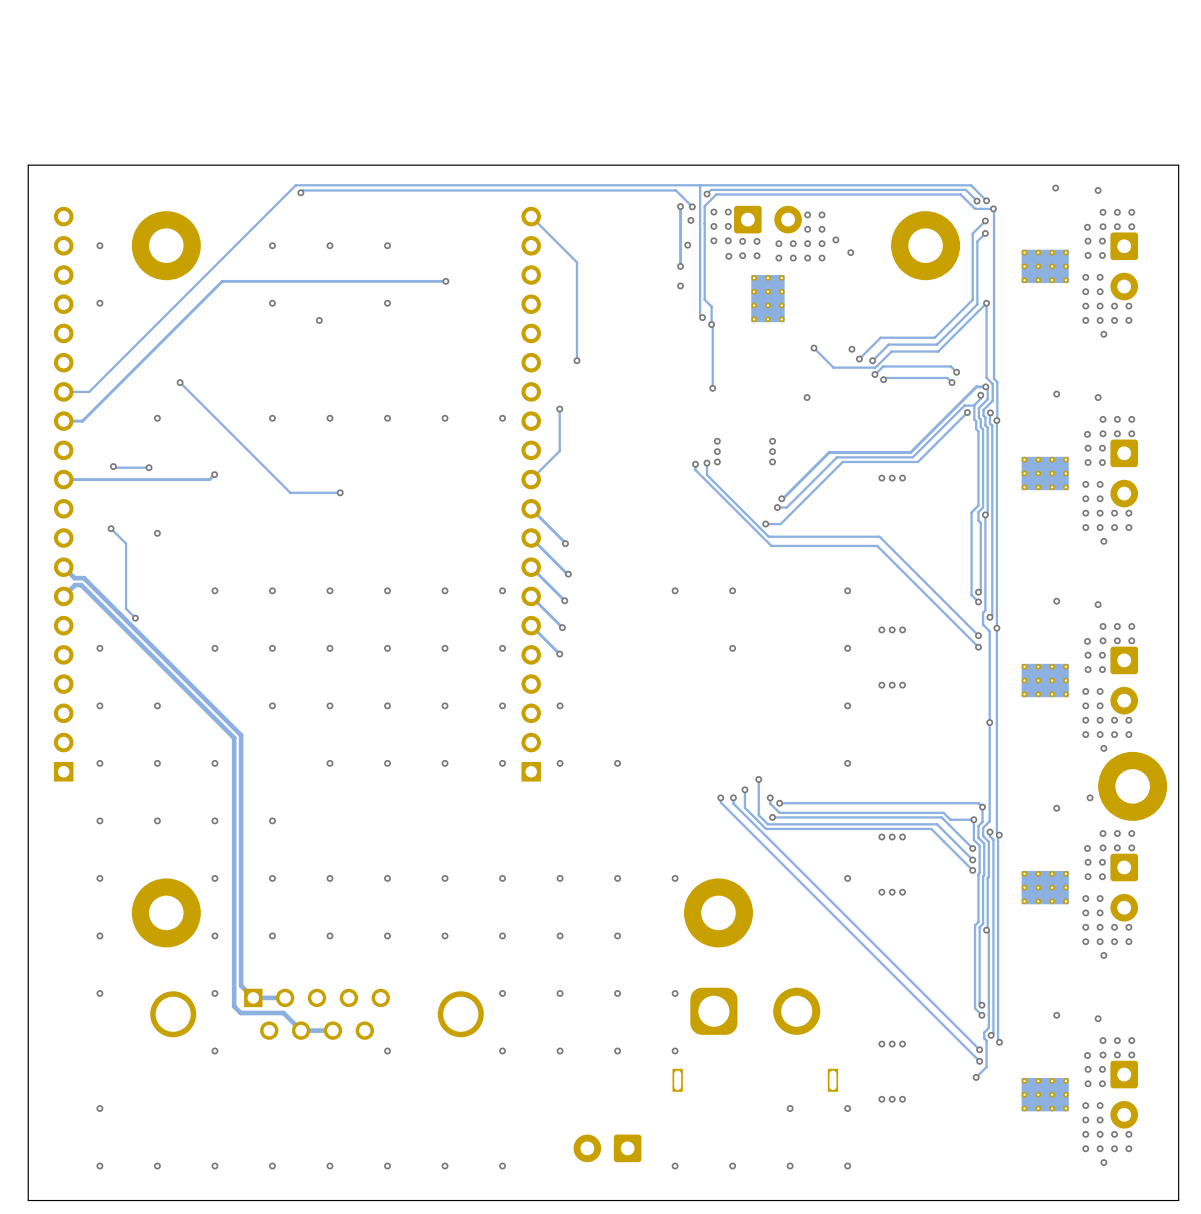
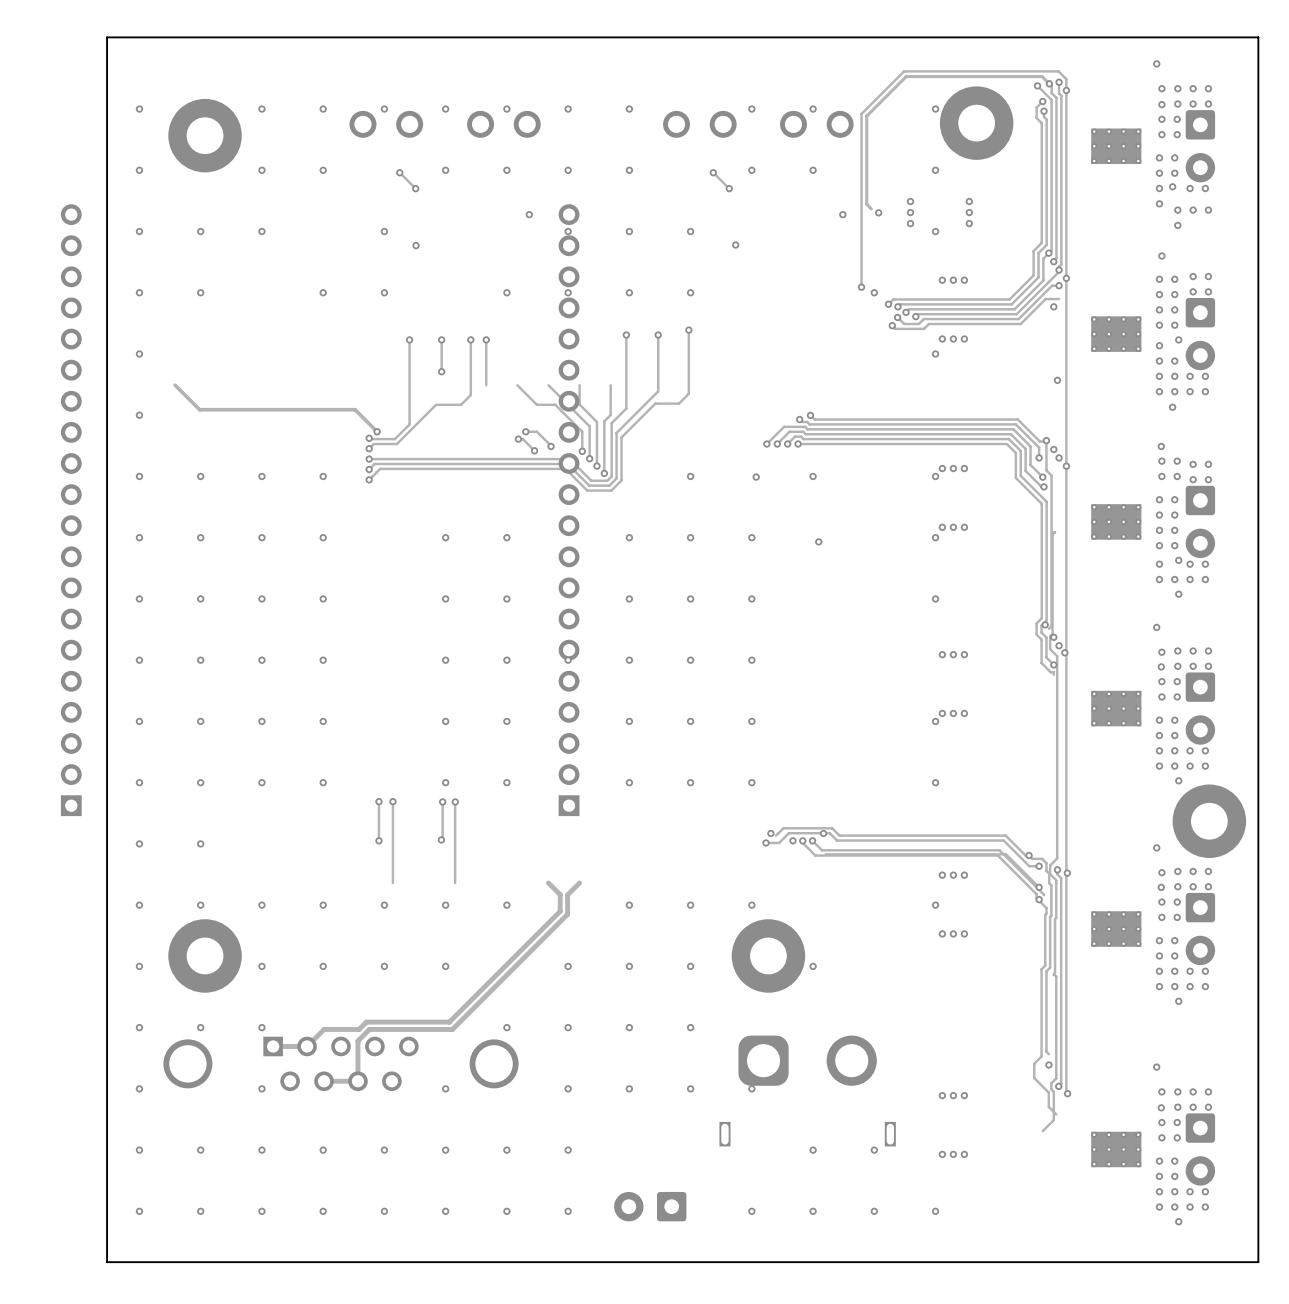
via: none -> (1156, 63)
track: none -> (1059, 82) (1059, 93) (1061, 95) (1061, 264) (1059, 266) (1059, 271) (1016, 314) (918, 314) (915, 316)
via: none -> (1059, 82)
via: none -> (1049, 83)
track: none -> (1037, 85) (1051, 99) (1051, 250) (1049, 253)
via: none -> (1037, 85)
via: none -> (1161, 88)
via: none -> (1177, 88)
via: none -> (1193, 88)
via: none -> (1208, 88)
via: none -> (1066, 90)
track: none -> (1042, 101) (1036, 107) (1036, 118) (1041, 123) (1041, 242) (1033, 251) (1033, 275) (1009, 299) (893, 299) (888, 304)
via: none -> (1042, 101)
via: none -> (1177, 104)
via: none -> (1193, 104)
via: none -> (1208, 104)
via: none -> (1161, 104)
via: none -> (139, 109)
via: none -> (261, 109)
via: none -> (323, 109)
via: none -> (384, 109)
via: none -> (445, 109)
via: none -> (506, 109)
via: none -> (568, 109)
via: none -> (629, 109)
via: none -> (751, 109)
via: none -> (813, 109)
via: none -> (935, 109)
track: none -> (1044, 111) (1044, 117) (1046, 119) (1046, 244) (1038, 253) (1038, 277) (1011, 304) (900, 304) (897, 306)
via: none -> (1044, 111)
via: none -> (1161, 119)
via: none -> (1177, 119)
part: none -> (386, 124)
part: none -> (503, 124)
part: none -> (699, 124)
part: none -> (816, 124)
via: none -> (1161, 134)
via: none -> (1177, 134)
part: none -> (1116, 146)
part: none -> (1200, 146)
via: none -> (1159, 157)
via: none -> (1174, 157)
board edge: (1178, 165) (28, 165) (28, 1200) (97, 1200) -> (1258, 159) (1258, 37) (107, 37) (107, 1262)
via: none -> (139, 170)
via: none -> (261, 170)
via: none -> (445, 170)
via: none -> (506, 170)
via: none -> (568, 170)
via: none -> (629, 170)
via: none -> (751, 170)
via: none -> (813, 170)
via: none -> (935, 170)
track: none -> (399, 172) (415, 188)
via: none -> (399, 172)
track: none -> (713, 172) (729, 188)
via: none -> (713, 172)
via: none -> (1159, 173)
via: none -> (1174, 173)
track: (700, 185) (700, 315) (702, 317) -> none
via: (1055, 188) -> none
track: (300, 192) (303, 190) (675, 190) (692, 206) -> none
via position: (300, 192) -> (323, 170)
via: none -> (415, 188)
via: none -> (729, 188)
via: none -> (1159, 188)
via: none -> (1190, 188)
via: none -> (1205, 188)
track: (706, 194) (711, 189) (965, 189) (977, 201) -> none
via: (706, 194) -> none
track: (986, 200) (970, 185) (295, 185) (89, 391) (63, 391) -> none
via: (986, 200) -> none
via: (977, 201) -> none
via: none -> (910, 201)
via: none -> (969, 201)
track: (680, 206) (680, 266) -> none
via: (680, 206) -> none
via: (692, 206) -> none
via: none -> (1159, 203)
via: (993, 208) -> none
track: none -> (871, 208) (866, 204) (866, 116) (906, 76) (1042, 76) (1051, 86) (1051, 93) (1056, 97) (1056, 257) (1053, 260)
via: (713, 212) -> none
via: (728, 212) -> none
via: (807, 214) -> none
via: none -> (910, 212)
via: none -> (969, 212)
via: none -> (529, 214)
track: (531, 216) (577, 262) (577, 360) -> none
via: none -> (842, 214)
part: (767, 219) -> none
via: (690, 220) -> none
track: (985, 220) (972, 233) (972, 299) (934, 337) (880, 337) (859, 359) -> none
via: (985, 220) -> none
via: none -> (910, 223)
via: none -> (969, 223)
via: (713, 226) -> none
via: (728, 226) -> none
via: (1117, 226) -> none
via: (1131, 226) -> none
via: (1087, 227) -> none
via: (807, 229) -> none
via: (822, 229) -> none
via: none -> (139, 231)
via: none -> (200, 231)
via: none -> (261, 231)
via: none -> (384, 231)
via: none -> (568, 231)
via: none -> (629, 231)
via: none -> (690, 231)
via: none -> (935, 231)
track: (985, 233) (977, 241) (977, 304) (937, 344) (888, 344) (872, 360) -> none
via: (985, 233) -> none
via: (835, 239) -> none
via: (713, 240) -> none
via: (728, 240) -> none
via: (742, 241) -> none
via: (757, 241) -> none
via: (1088, 241) -> none
via: (1102, 241) -> none
via: (778, 243) -> none
via: (793, 243) -> none
via: (807, 243) -> none
via: (822, 243) -> none
via: (99, 245) -> none
part position: (166, 245) -> (205, 135)
via: (272, 245) -> none
via: (329, 245) -> none
part position: (925, 245) -> (976, 123)
via: (850, 252) -> none
track: none -> (1048, 253) (1043, 258) (1043, 280) (1014, 309) (909, 309) (906, 312) (906, 310)
via: none -> (1048, 253)
via: (742, 255) -> none
via: (757, 255) -> none
via: (1102, 255) -> none
via: (728, 256) -> none
via: (778, 258) -> none
via: (793, 258) -> none
via: (807, 258) -> none
via: (822, 258) -> none
via: none -> (1053, 261)
via: (680, 266) -> none
part: (1045, 266) -> none
part: (1124, 266) -> none
via: none -> (1059, 270)
via: none -> (1193, 276)
via: none -> (1208, 276)
via: none -> (1066, 278)
via: none -> (942, 280)
via: none -> (953, 280)
via: none -> (964, 280)
track: (445, 281) (222, 281) (82, 421) (63, 421) -> none
via: (445, 281) -> none
track: none -> (1059, 285) (1052, 285) (1018, 319) (923, 319) (918, 323) (904, 323) (897, 317)
via: none -> (1059, 285)
track: none -> (861, 287) (861, 113) (904, 71) (1058, 71) (1066, 79) (1066, 1093)
via: none -> (861, 287)
via: (680, 285) -> none
via: none -> (139, 292)
via: none -> (200, 292)
via: none -> (323, 292)
via: none -> (384, 292)
via: none -> (506, 292)
via: none -> (568, 292)
via: none -> (629, 292)
via: none -> (690, 292)
via: none -> (874, 292)
via: none -> (1193, 291)
via: none -> (1208, 291)
track: none -> (1059, 299) (1045, 299) (1020, 323) (928, 323) (923, 328) (895, 328) (892, 325)
part: (767, 298) -> none
via: none -> (888, 304)
via: (99, 303) -> none
via: (272, 303) -> none
via: (387, 303) -> none
via: none -> (897, 306)
via: (1114, 306) -> none
via: (1128, 306) -> none
via: none -> (906, 312)
via: none -> (915, 316)
via: none -> (897, 317)
via: (702, 317) -> none
via: (319, 320) -> none
via: none -> (892, 325)
via: (1114, 320) -> none
via: (1128, 320) -> none
via: (711, 324) -> none
track: none -> (688, 330) (688, 393) (679, 403) (655, 403) (621, 437) (621, 480) (611, 490) (587, 490) (565, 468) (380, 468) (369, 479)
via: none -> (688, 330)
part: none -> (1116, 334)
part: none -> (1200, 334)
track: none -> (626, 335) (626, 408) (611, 423) (611, 476) (607, 480) (591, 480) (569, 459) (369, 459)
via: none -> (626, 335)
track: none -> (658, 335) (658, 391) (616, 432) (616, 478) (609, 485) (589, 485) (567, 463) (374, 463) (369, 469)
via: none -> (658, 335)
via: none -> (942, 339)
via: none -> (953, 339)
via: none -> (964, 339)
track: none -> (409, 339) (409, 424) (394, 439) (369, 438)
via: none -> (409, 339)
track: none -> (441, 339) (441, 371)
via: none -> (441, 339)
track: none -> (470, 339) (470, 395) (461, 404) (436, 404) (396, 444) (373, 444) (369, 448)
via: none -> (470, 339)
track: none -> (486, 339) (486, 385)
via: none -> (486, 339)
via: none -> (1159, 345)
via: none -> (139, 354)
via: none -> (935, 354)
track: (813, 348) (833, 367) (875, 367) (891, 351) (938, 351) (986, 303) (986, 377) (992, 384) (992, 400) (983, 410) (985, 425) (987, 427) (987, 514) -> none
via: (813, 348) -> none
via: (851, 349) -> none
via: none -> (1159, 361)
via: none -> (1174, 361)
via: (859, 359) -> none
via: (577, 360) -> none
via: (872, 360) -> none
via: none -> (441, 371)
via: none -> (1159, 376)
via: none -> (1174, 376)
via: none -> (1190, 376)
via: none -> (1205, 376)
track: (956, 372) (950, 366) (883, 366) (875, 374) -> none
via: (956, 372) -> none
via: none -> (1057, 380)
via: (874, 374) -> none
track: none -> (175, 385) (199, 409) (355, 409) (377, 431)
track: none -> (517, 385) (536, 404) (555, 404) (582, 431) (582, 451)
track: none -> (548, 385) (589, 426) (589, 457)
track: none -> (579, 385) (579, 404) (596, 421) (596, 466)
track: none -> (610, 385) (610, 414) (604, 421) (604, 473)
track: (883, 379) (885, 377) (947, 377) (952, 382) -> none
via: (883, 379) -> none
track: (180, 382) (290, 492) (340, 492) -> none
via: (180, 382) -> none
via: (952, 382) -> none
via: none -> (1159, 391)
via: none -> (1174, 391)
via: none -> (1190, 391)
via: none -> (1205, 391)
via: (985, 386) -> none
track: (712, 388) (711, 306) (704, 299) (704, 206) (716, 194) (960, 194) (975, 208) (994, 209) (994, 378) (997, 382) (996, 832) (999, 835) (999, 1042) -> none
via: (712, 388) -> none
via: (1056, 394) -> none
track: (980, 395) (980, 398) (973, 405) -> none
via: (980, 395) -> none
via: (807, 397) -> none
via: none -> (139, 415)
track: none -> (810, 415) (814, 419) (1017, 419) (1039, 441) (1046, 440) (1046, 470) (1051, 475) (1051, 626) (1049, 628)
via: none -> (810, 415)
track: (973, 405) (974, 419) (978, 431) (978, 505) (971, 512) (971, 595) (978, 601) -> none
track: (973, 405) (964, 405) (912, 457) (836, 457) (786, 507) (777, 507) -> none
track: (559, 409) (559, 451) (531, 479) -> none
via: (559, 409) -> none
track: none -> (799, 419) (809, 424) (1015, 424) (1039, 447) (1039, 457)
via: none -> (799, 419)
track: (967, 412) (917, 461) (842, 461) (780, 524) (765, 524) -> none
via: (967, 412) -> none
track: (990, 412) (989, 423) (992, 425) (992, 614) (989, 617) -> none
via: (990, 412) -> none
via: (157, 418) -> none
via: (272, 418) -> none
via: (329, 418) -> none
via: (387, 418) -> none
via: (445, 418) -> none
via: (502, 418) -> none
via: (1103, 419) -> none
via: (1117, 419) -> none
via: (1131, 419) -> none
via: none -> (377, 431)
track: none -> (525, 431) (536, 431) (551, 446)
via: none -> (525, 431)
via: (996, 420) -> none
via: none -> (369, 438)
track: none -> (518, 439) (522, 439) (534, 450)
via: none -> (518, 439)
via: none -> (1046, 440)
track: none -> (766, 444) (784, 426) (805, 426) (807, 429) (1013, 429) (1030, 446) (1030, 464) (1042, 477)
via: none -> (766, 444)
track: none -> (777, 444) (789, 431) (803, 431) (805, 434) (1010, 434) (1025, 448) (1025, 470) (1041, 486) (1044, 486)
via: none -> (777, 444)
track: none -> (787, 444) (795, 436) (801, 436) (803, 439) (1008, 439) (1020, 450) (1020, 475) (1046, 501) (1046, 620) (1041, 625) (1041, 632) (1046, 637) (1046, 657) (1053, 664)
via: none -> (787, 444)
track: none -> (798, 444) (1006, 444) (1015, 452) (1015, 477) (1041, 503) (1041, 618) (1036, 623) (1036, 634) (1041, 639) (1041, 663) (1050, 672) (1053, 672) (1053, 674)
via: none -> (798, 444)
via: (1103, 433) -> none
via: (1117, 433) -> none
via: (1131, 433) -> none
via: none -> (551, 446)
via: none -> (369, 448)
via: none -> (1053, 449)
via: none -> (534, 450)
via: none -> (582, 451)
via: (717, 441) -> none
via: (772, 441) -> none
via: none -> (589, 458)
via: none -> (1039, 457)
via: none -> (1059, 457)
via: none -> (369, 459)
via: (717, 451) -> none
via: (772, 451) -> none
via: none -> (1193, 464)
via: none -> (1208, 464)
via: none -> (596, 466)
via: none -> (1066, 466)
via: none -> (369, 469)
via: none -> (942, 468)
via: none -> (953, 468)
via: none -> (964, 468)
via: none -> (604, 473)
via: (717, 461) -> none
via: (772, 461) -> none
via: none -> (139, 476)
via: none -> (200, 476)
via: none -> (261, 476)
via: none -> (323, 476)
via: none -> (690, 476)
via: none -> (813, 476)
via: none -> (935, 476)
track: (706, 463) (706, 475) (768, 536) (879, 536) (978, 635) -> none
via: none -> (1042, 477)
track: (695, 464) (695, 470) (771, 545) (877, 545) (978, 647) -> none
via: (695, 464) -> none
via: none -> (369, 479)
via: none -> (1193, 479)
via: none -> (1208, 479)
track: (113, 466) (149, 467) -> none
via: (113, 466) -> none
via: (149, 467) -> none
via: none -> (1044, 486)
part position: (1045, 473) -> (1116, 521)
part position: (1124, 473) -> (1200, 521)
track: (214, 474) (209, 479) (63, 479) -> none
via: (214, 474) -> none
via: (881, 478) -> none
via: (892, 478) -> none
via: (902, 478) -> none
via: (340, 492) -> none
track: (781, 498) (829, 452) (910, 452) (976, 386) (985, 386) (987, 388) (987, 399) (978, 408) (978, 417) (983, 429) (983, 507) (978, 512) (978, 520) (980, 522) (980, 589) (978, 592) -> none
via: (781, 498) -> none
via: (777, 507) -> none
track: (531, 508) (565, 543) -> none
via: none -> (942, 527)
via: none -> (953, 527)
via: none -> (964, 527)
via: (1114, 513) -> none
via: (1128, 513) -> none
via: (985, 514) -> none
via: none -> (139, 537)
via: none -> (200, 537)
via: none -> (261, 537)
via: none -> (323, 537)
via: none -> (445, 537)
via: none -> (506, 537)
via: none -> (629, 537)
via: none -> (690, 537)
via: none -> (751, 537)
via: none -> (935, 537)
via: (1114, 527) -> none
via: (1128, 527) -> none
track: (111, 528) (126, 543) (126, 608) (135, 618) -> none
via: (111, 528) -> none
via: (157, 533) -> none
track: (531, 538) (568, 574) -> none
via: (565, 543) -> none
via: none -> (1159, 564)
via: none -> (1190, 564)
via: none -> (1205, 564)
via: none -> (1159, 579)
via: none -> (1174, 579)
via: none -> (1190, 579)
via: none -> (1205, 579)
track: (63, 567) (74, 578) (84, 578) (241, 735) (241, 985) (253, 997) -> none
track: (531, 567) (564, 600) -> none
via: none -> (1178, 594)
via: (568, 574) -> none
via: none -> (139, 598)
via: none -> (200, 598)
via: none -> (261, 598)
via: none -> (323, 598)
via: none -> (445, 598)
via: none -> (506, 598)
via: none -> (629, 598)
via: none -> (690, 598)
via: none -> (751, 598)
via: (214, 590) -> none
via: (272, 590) -> none
via: (329, 590) -> none
via: (387, 590) -> none
via: (445, 590) -> none
via: (502, 590) -> none
via: (675, 590) -> none
via: (732, 590) -> none
via position: (847, 590) -> (935, 598)
via: (978, 592) -> none
track: (63, 596) (75, 585) (81, 585) (234, 738) (234, 1006) (240, 1013) (283, 1013) (301, 1030) -> none
track: (531, 596) (563, 627) -> none
via: (564, 600) -> none
via: (1056, 601) -> none
via: none -> (1156, 627)
via: (1098, 604) -> none
via: none -> (1053, 637)
via: (989, 617) -> none
via: (135, 618) -> none
via: none -> (1059, 645)
track: (531, 625) (559, 654) -> none
via: (562, 627) -> none
via: none -> (1161, 652)
via: none -> (139, 660)
via: none -> (200, 660)
via: none -> (261, 660)
via: none -> (323, 660)
via: none -> (445, 660)
via: none -> (506, 660)
via: none -> (568, 660)
via: none -> (629, 660)
via: none -> (690, 660)
via: none -> (751, 660)
via: (978, 635) -> none
via: none -> (1053, 664)
via: (978, 647) -> none
via: (99, 648) -> none
via: (214, 648) -> none
via: (272, 648) -> none
via: (329, 648) -> none
via: (387, 648) -> none
via: (445, 648) -> none
via: (502, 648) -> none
via: (732, 648) -> none
via: (847, 648) -> none
via: (559, 654) -> none
via: none -> (139, 721)
via: none -> (200, 721)
via: none -> (261, 721)
via: none -> (323, 721)
via: none -> (445, 721)
via: none -> (506, 721)
via: none -> (629, 721)
via: none -> (690, 721)
via: none -> (751, 721)
via: none -> (935, 721)
via: (99, 705) -> none
via: (157, 705) -> none
via: (272, 705) -> none
via: (329, 705) -> none
via: (387, 705) -> none
via: (445, 705) -> none
via: (502, 705) -> none
via: (560, 705) -> none
via: (847, 705) -> none
via: (989, 722) -> none
via: none -> (139, 782)
via: none -> (200, 782)
via: none -> (261, 782)
via: none -> (323, 782)
via: none -> (445, 782)
via: none -> (506, 782)
via: none -> (629, 782)
via: none -> (690, 782)
via: none -> (751, 782)
via: none -> (935, 782)
via: (99, 763) -> none
via: (157, 763) -> none
via: (214, 763) -> none
via: (329, 763) -> none
via: (387, 763) -> none
via: (445, 763) -> none
via: (502, 763) -> none
via: (560, 763) -> none
via: (617, 763) -> none
via: (847, 763) -> none
track: none -> (378, 801) (378, 840)
via: none -> (378, 801)
track: none -> (392, 801) (392, 882)
via: none -> (392, 801)
track: none -> (442, 801) (441, 839)
via: none -> (442, 801)
track: none -> (455, 802) (455, 882)
via: none -> (455, 801)
track: (758, 779) (758, 815) (767, 824) (937, 824) (972, 860) -> none
via: (758, 779) -> none
track: (744, 789) (744, 807) (766, 828) (931, 828) (972, 870) -> none
via: (744, 789) -> none
track: (720, 797) (720, 802) (979, 1061) -> none
track: none -> (778, 833) (775, 835)
track: (733, 797) (733, 803) (979, 1049) -> none
via: (733, 797) -> none
track: (770, 797) (770, 803) (779, 812) (943, 812) (950, 819) (973, 819) (973, 839) (979, 845) (979, 867) -> (802, 840) (815, 855) (997, 855) (1036, 894) (1036, 898) (1046, 908)
via: (1090, 797) -> none
via: none -> (441, 839)
track: (779, 803) (978, 803) (982, 807) (982, 822) (978, 826) (978, 837) (984, 843) (984, 846) -> (778, 833) (783, 828) (832, 828) (839, 835) (1005, 835) (1025, 855) (1029, 855) (1032, 858) (1042, 858) (1046, 863) (1046, 870) (1049, 873) (1049, 883) (1051, 885)
via: (779, 803) -> none
via: none -> (378, 840)
via: none -> (792, 840)
via: none -> (802, 840)
track: none -> (812, 840) (822, 850) (999, 850) (1044, 895)
via: none -> (812, 840)
track: none -> (765, 842) (779, 842) (788, 833) (829, 833) (837, 840) (1003, 840) (1029, 866) (1039, 866)
via: none -> (765, 842)
via: none -> (139, 843)
via: none -> (200, 843)
via: (982, 807) -> none
via: (1056, 808) -> none
via: none -> (1156, 847)
via: (772, 817) -> none
via: none -> (1029, 855)
via: (973, 819) -> none
via: (99, 820) -> none
via: (157, 820) -> none
via: (214, 820) -> none
via: (272, 820) -> none
via: none -> (1039, 866)
via: none -> (1161, 872)
track: none -> (548, 882) (560, 894) (560, 911) (449, 1022) (366, 1022) (359, 1029) (324, 1029) (307, 1046)
track: none -> (579, 882) (567, 894) (567, 914) (452, 1029) (369, 1029) (357, 1040) (357, 1081)
via: none -> (139, 905)
via: none -> (200, 905)
via: none -> (261, 905)
via: none -> (323, 905)
via: none -> (384, 905)
via: none -> (445, 905)
via: none -> (506, 905)
via: none -> (629, 905)
via: none -> (690, 905)
via: none -> (751, 905)
via: (972, 870) -> none
via: (99, 878) -> none
via: (214, 878) -> none
via: (272, 878) -> none
via: (329, 878) -> none
via: (387, 878) -> none
via: (445, 878) -> none
via: (502, 878) -> none
via: (560, 878) -> none
via: (617, 878) -> none
via: (675, 878) -> none
via position: (847, 878) -> (935, 905)
part position: (166, 912) -> (205, 955)
via: none -> (139, 966)
via: none -> (261, 966)
via: none -> (323, 966)
via: none -> (384, 966)
via: none -> (445, 966)
via: none -> (568, 966)
via: none -> (629, 966)
via: none -> (690, 966)
via: none -> (813, 966)
via: (986, 930) -> none
via: (99, 935) -> none
via: (214, 935) -> none
via: (272, 935) -> none
via: (329, 935) -> none
via: (387, 935) -> none
via: (445, 935) -> none
via: (502, 935) -> none
via: (560, 935) -> none
via: (617, 935) -> none
via: none -> (139, 1027)
via: none -> (200, 1027)
via: none -> (261, 1027)
via: none -> (506, 1027)
via: none -> (568, 1027)
via: none -> (629, 1027)
via: none -> (690, 1027)
via: (99, 993) -> none
via: (214, 993) -> none
via: (502, 993) -> none
via: (560, 993) -> none
via: (617, 993) -> none
via: (675, 993) -> none
via: (981, 1005) -> none
track: (975, 1007) (981, 1015) -> (1041, 1056) (1034, 1063) (1034, 1078) (1048, 1092) (1048, 1106) (1056, 1114)
via: (1056, 1015) -> none
via: none -> (1156, 1067)
via: (1098, 1018) -> none
via: none -> (139, 1088)
via: none -> (261, 1088)
via: none -> (445, 1088)
via: none -> (568, 1088)
via: none -> (629, 1088)
via: none -> (690, 1088)
via: none -> (751, 1088)
via: none -> (1161, 1091)
via: (979, 1049) -> none
via: (214, 1050) -> none
via: (387, 1050) -> none
via: (502, 1050) -> none
via: (560, 1050) -> none
via: (617, 1050) -> none
via: (675, 1050) -> none
via: (979, 1061) -> none
via: (976, 1077) -> none
via: none -> (139, 1150)
via: none -> (200, 1150)
via: none -> (261, 1150)
via: none -> (323, 1150)
via: none -> (384, 1150)
via: none -> (445, 1150)
via: none -> (506, 1150)
via: none -> (568, 1150)
via: none -> (813, 1150)
via: none -> (874, 1150)
via: (99, 1108) -> none
via: (790, 1108) -> none
via: (847, 1108) -> none
via: none -> (139, 1211)
via: none -> (200, 1211)
via: none -> (261, 1211)
via: none -> (323, 1211)
via: none -> (384, 1211)
via: none -> (445, 1211)
via: none -> (506, 1211)
via: none -> (568, 1211)
via: none -> (751, 1211)
via: none -> (813, 1211)
via: none -> (874, 1211)
via: none -> (935, 1211)
via: (99, 1166) -> none
via: (157, 1166) -> none
via: (214, 1166) -> none
via: (272, 1166) -> none
via: (329, 1166) -> none
via: (387, 1166) -> none
via: (445, 1166) -> none
via: (502, 1166) -> none
via: (675, 1166) -> none
via: (732, 1166) -> none
via: (790, 1166) -> none
via: (847, 1166) -> none

